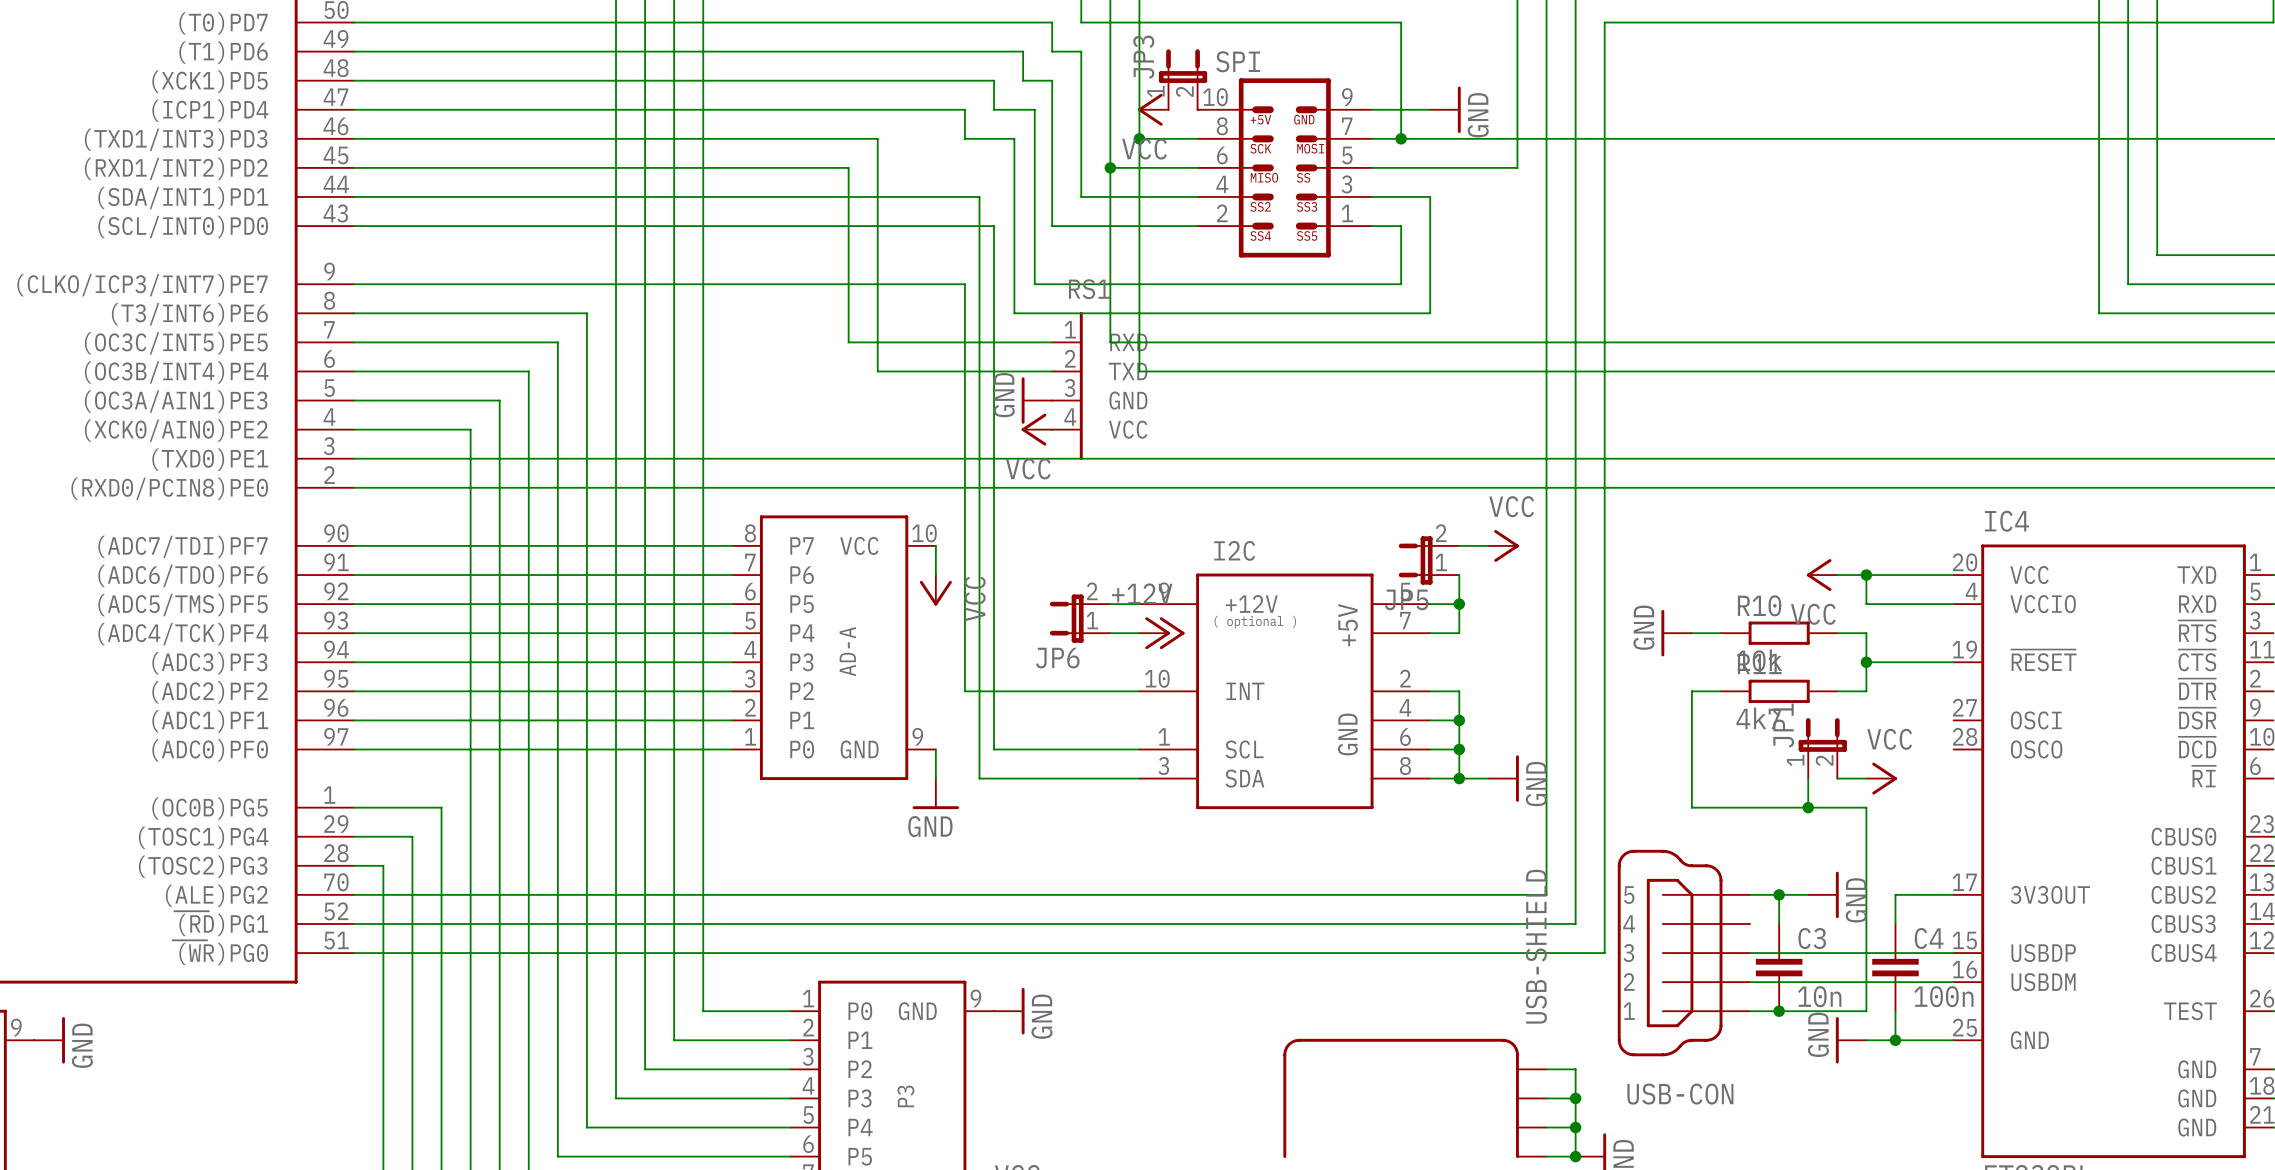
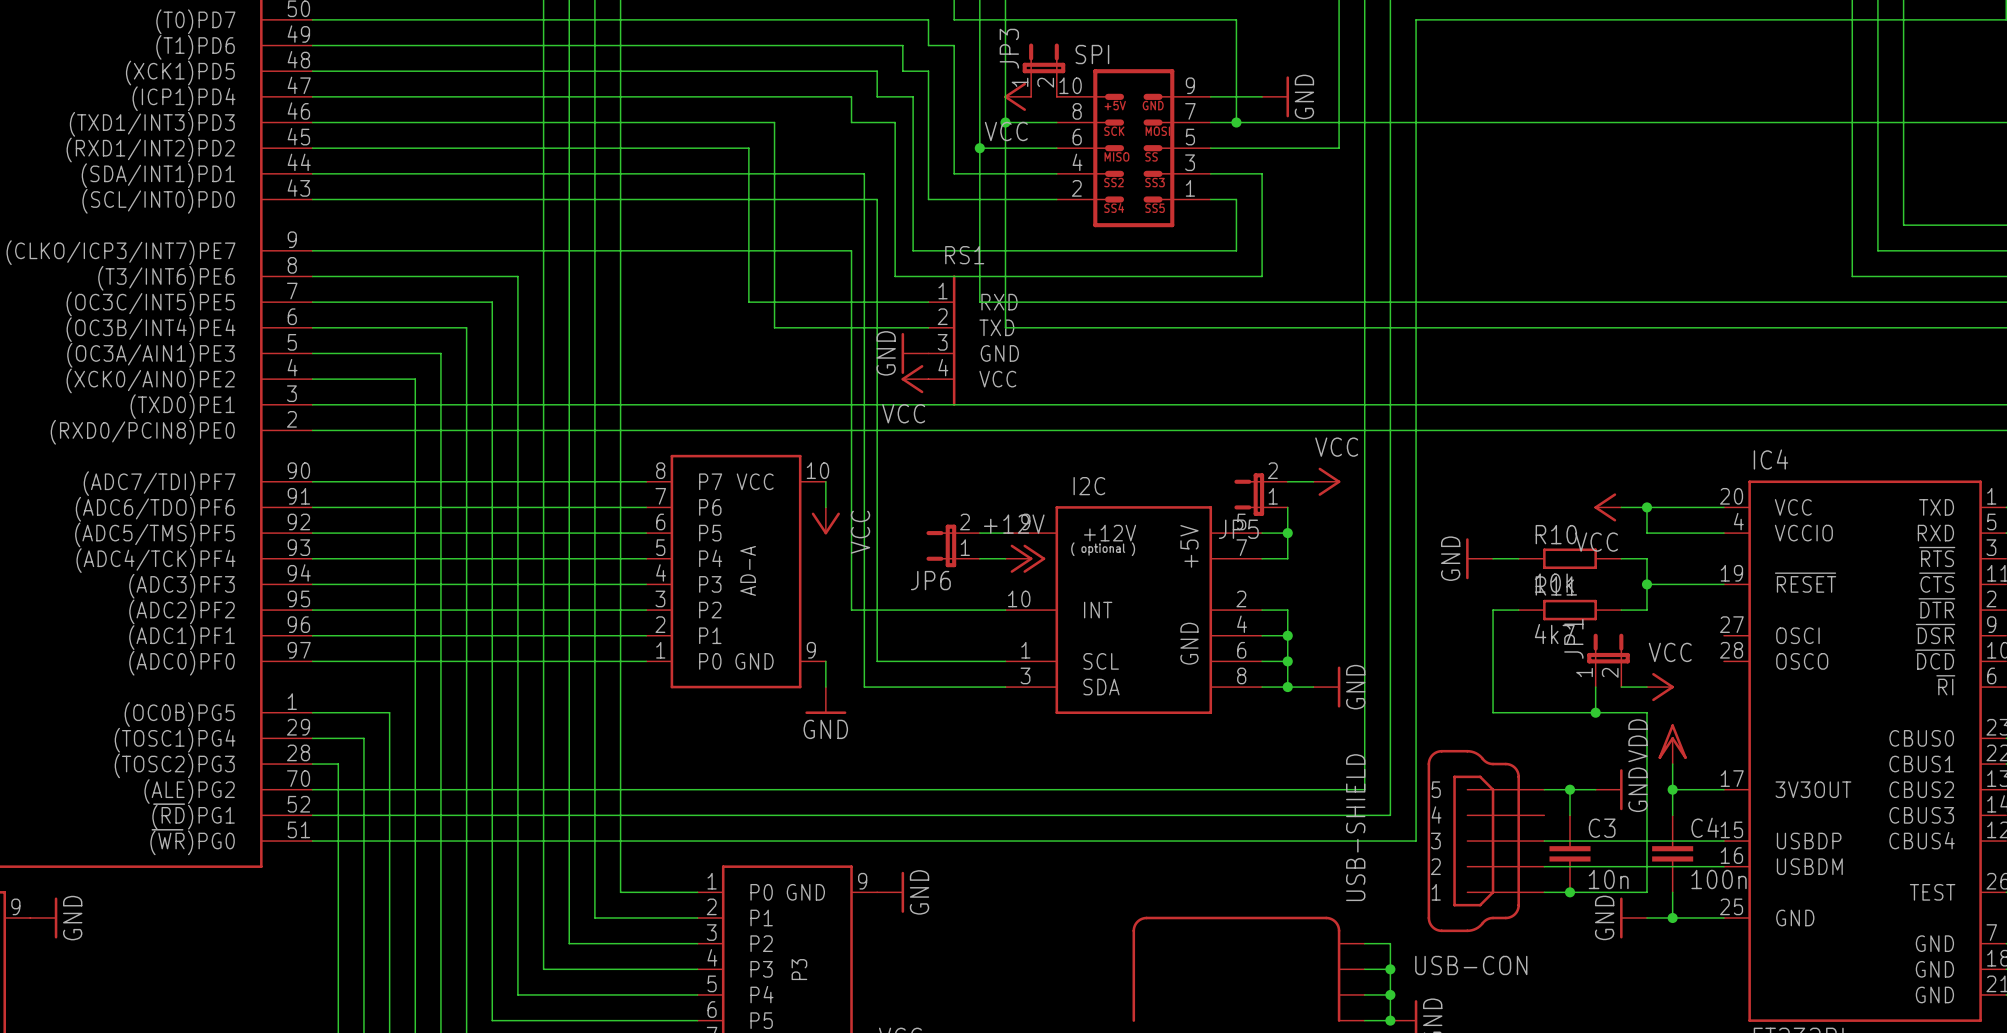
power symbol: none -> VDD (1672, 744)
wire: none -> (1672, 764) (1672, 789)
junction: none -> (1672, 789)

